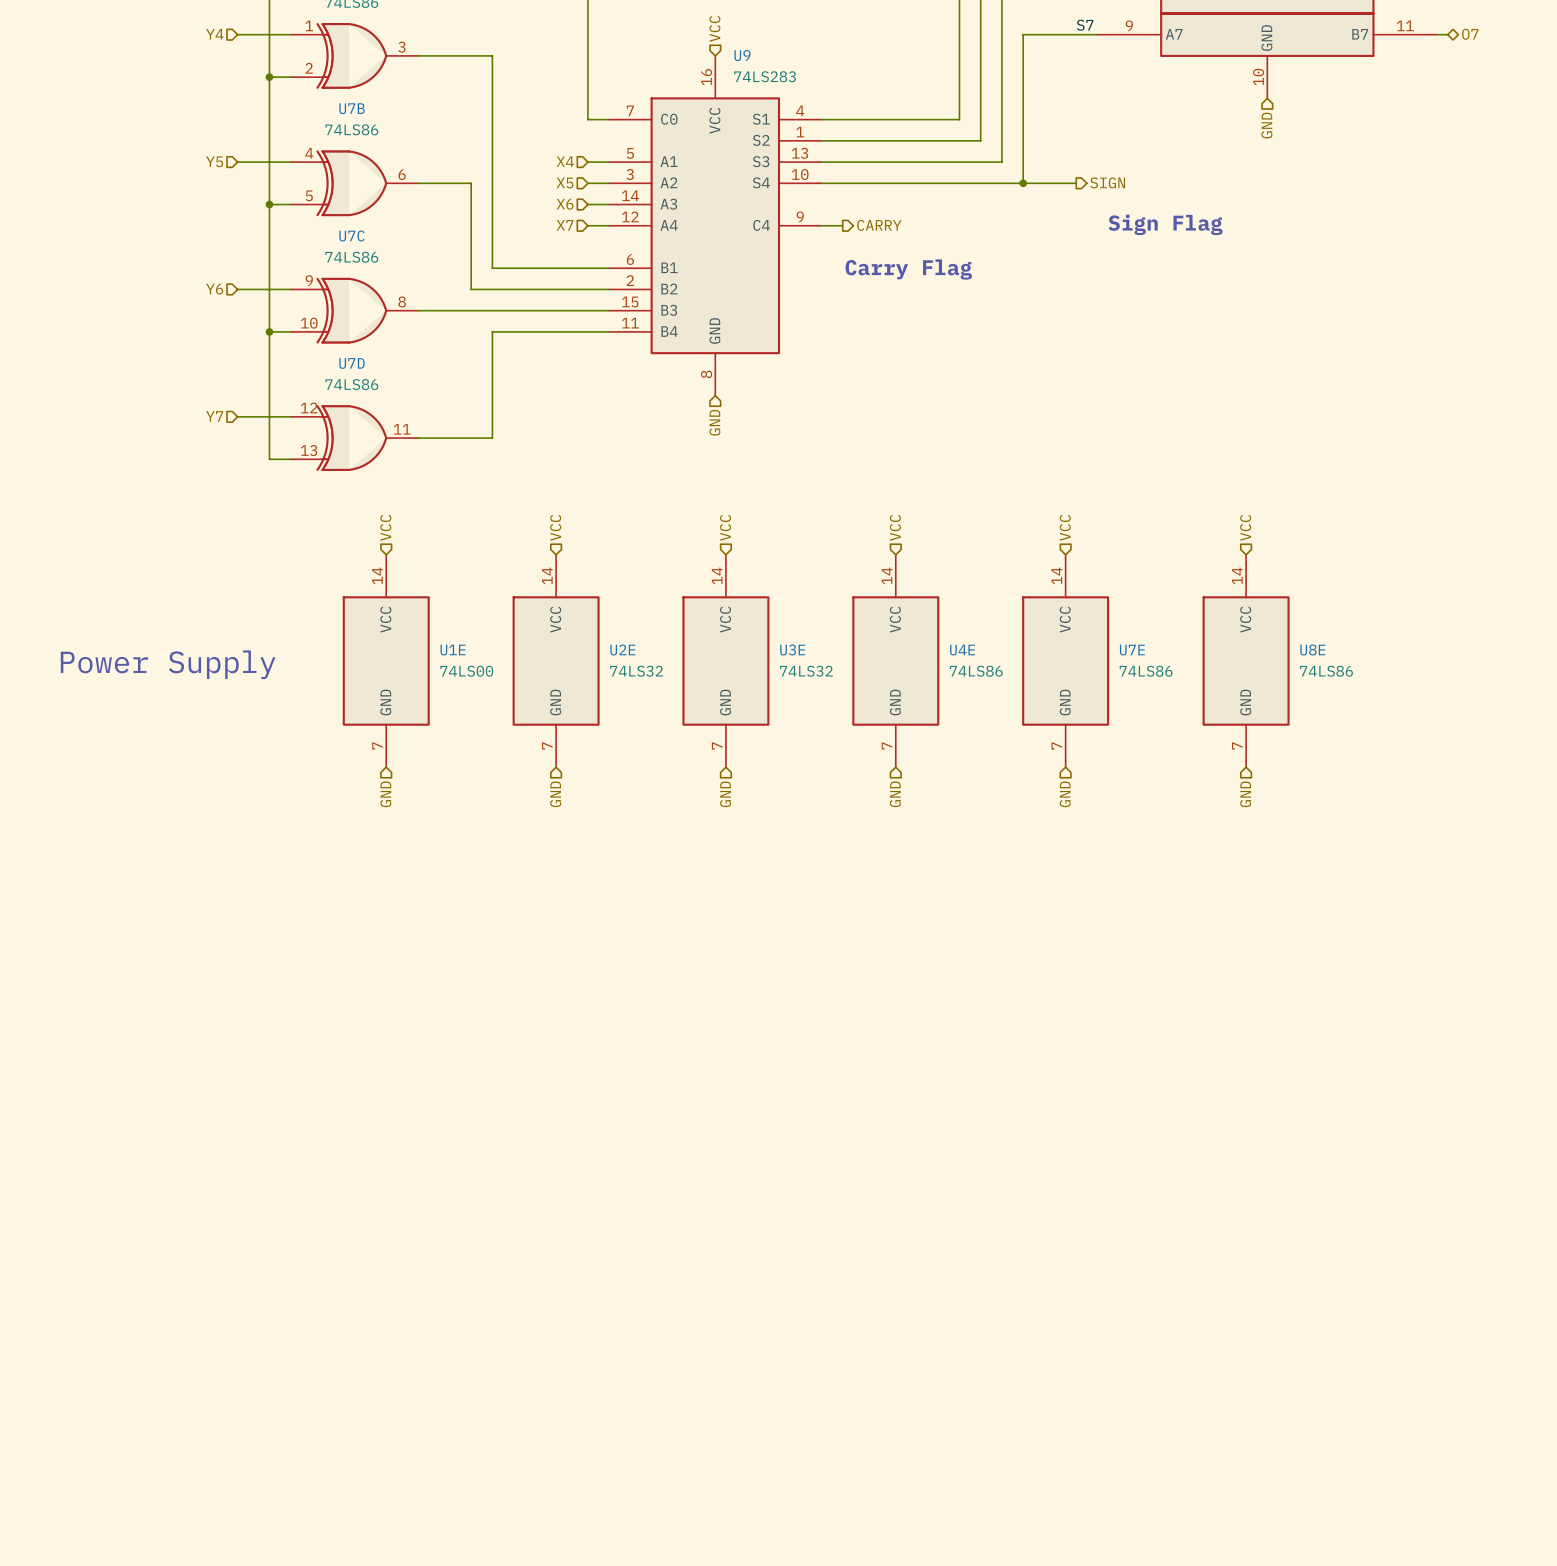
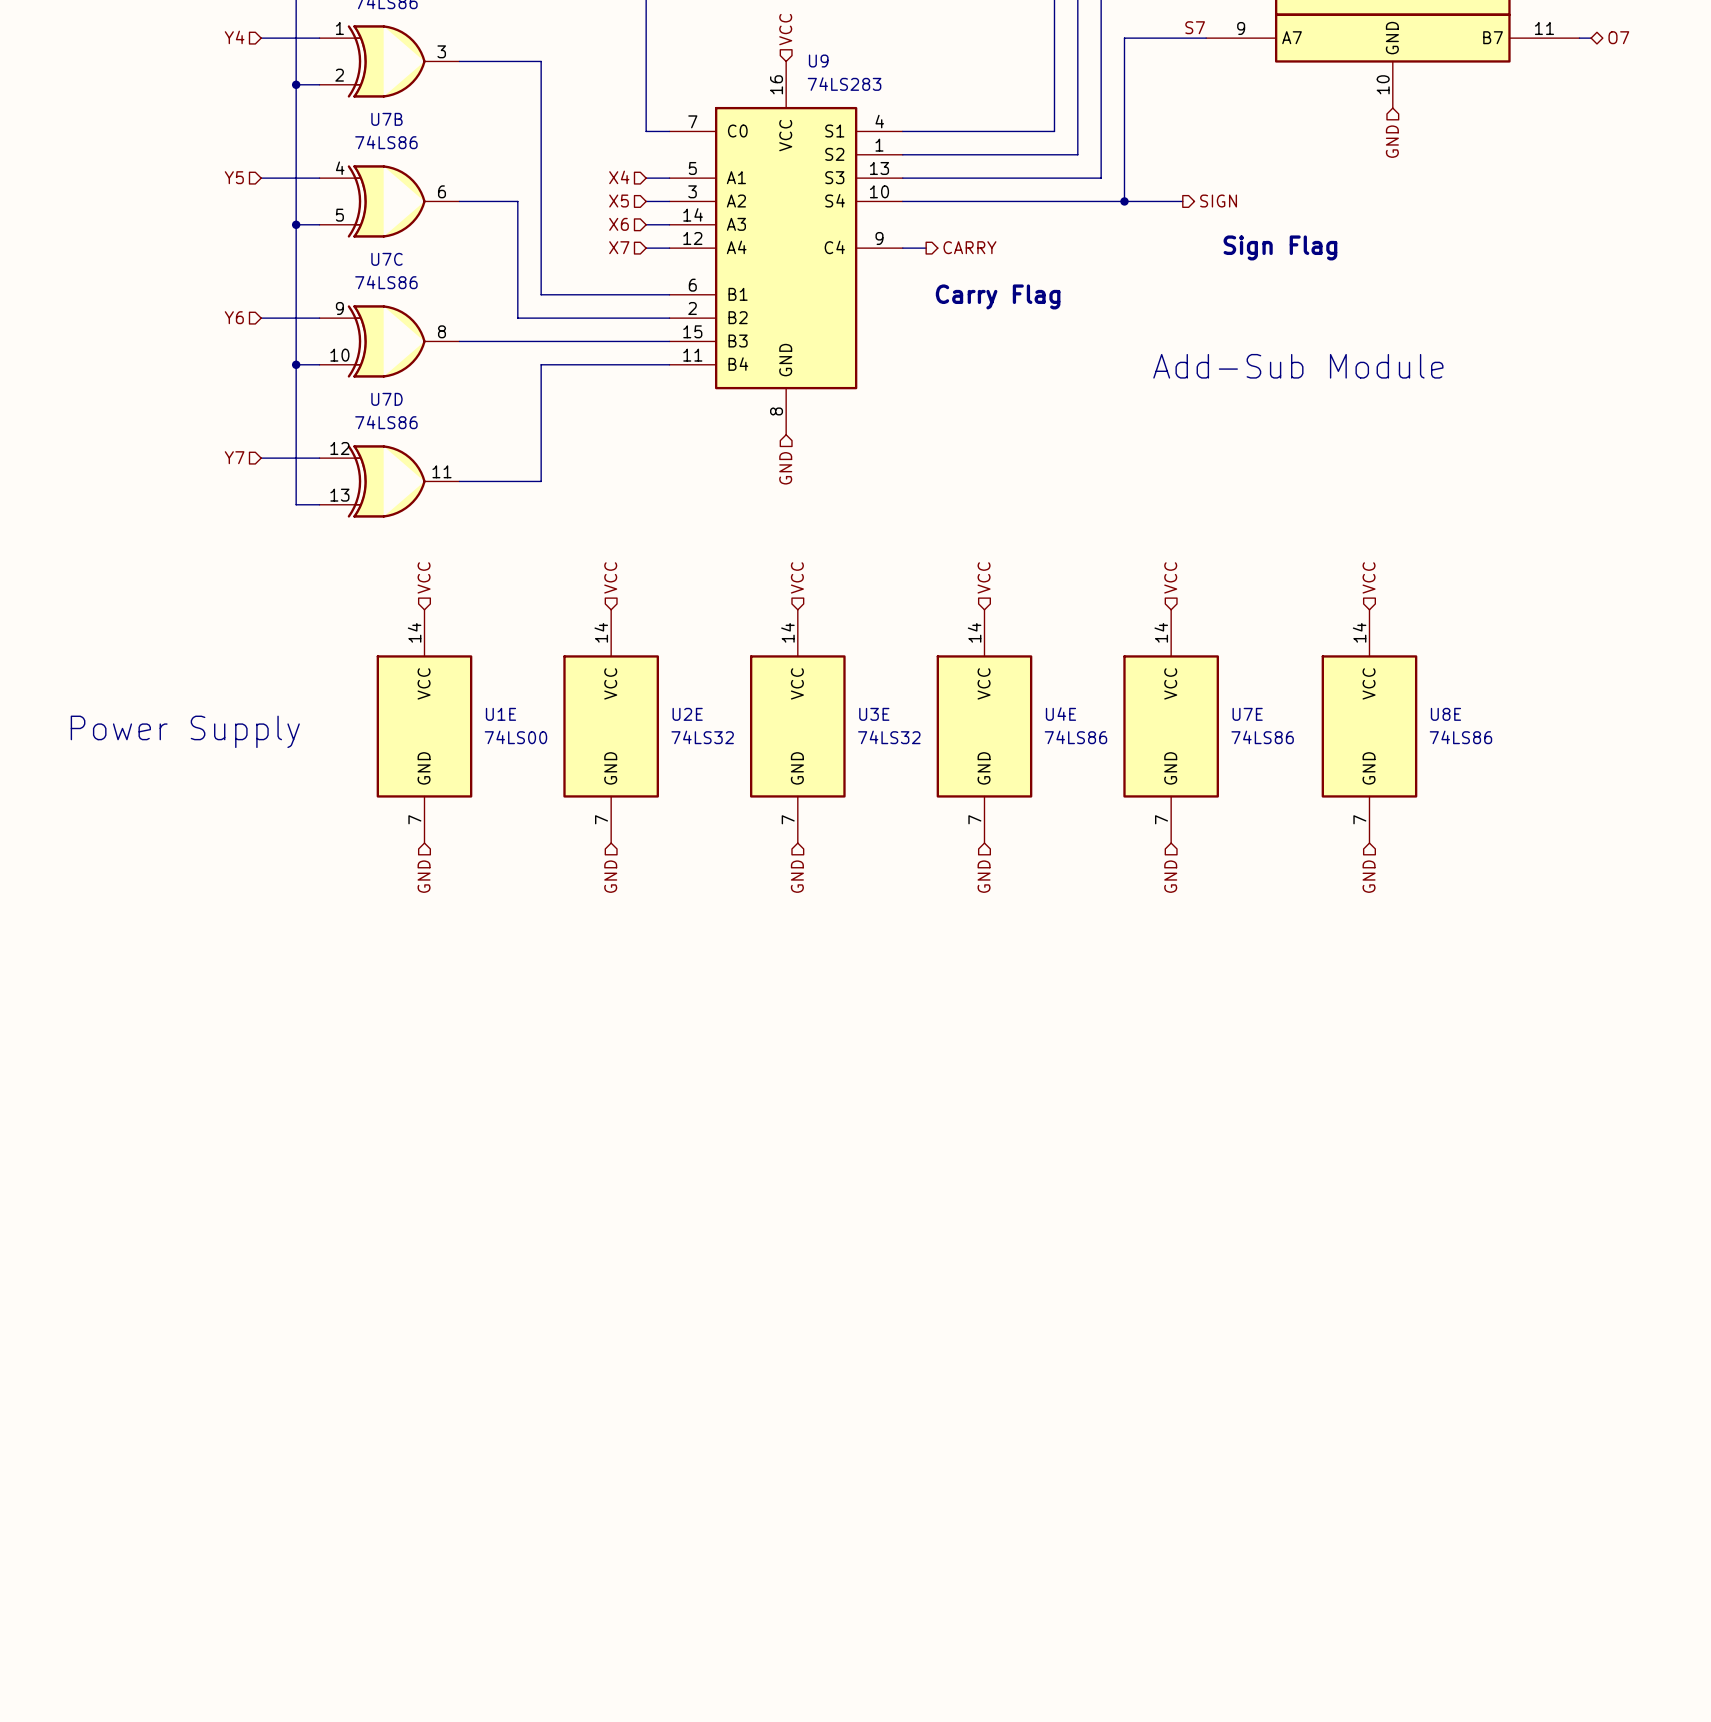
text: none -> Add-Sub Module (1298, 366)

